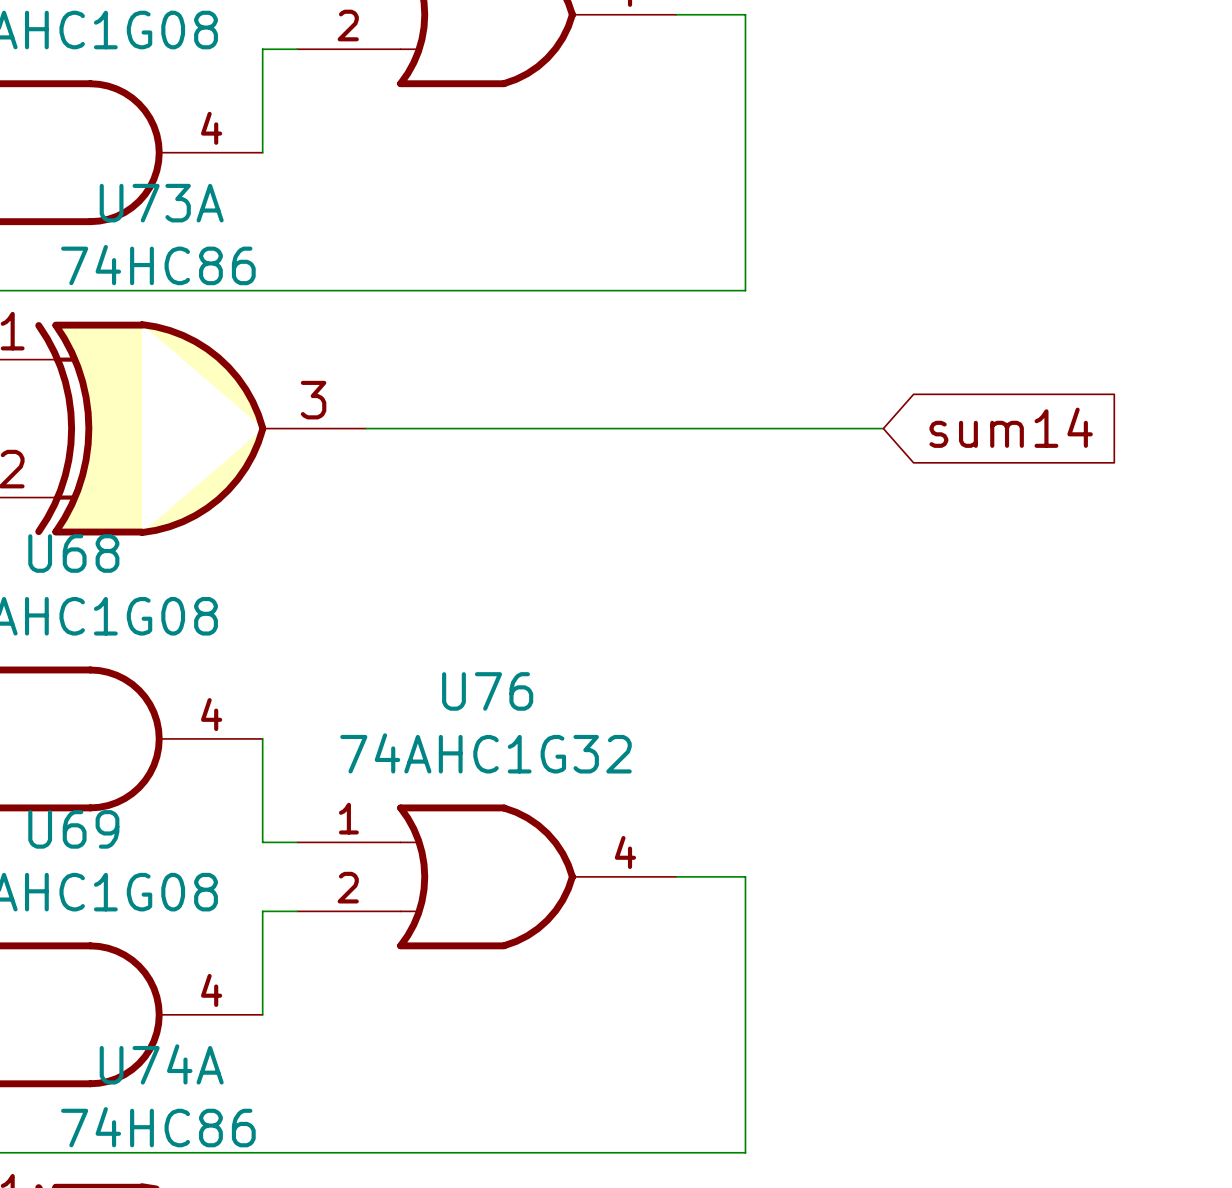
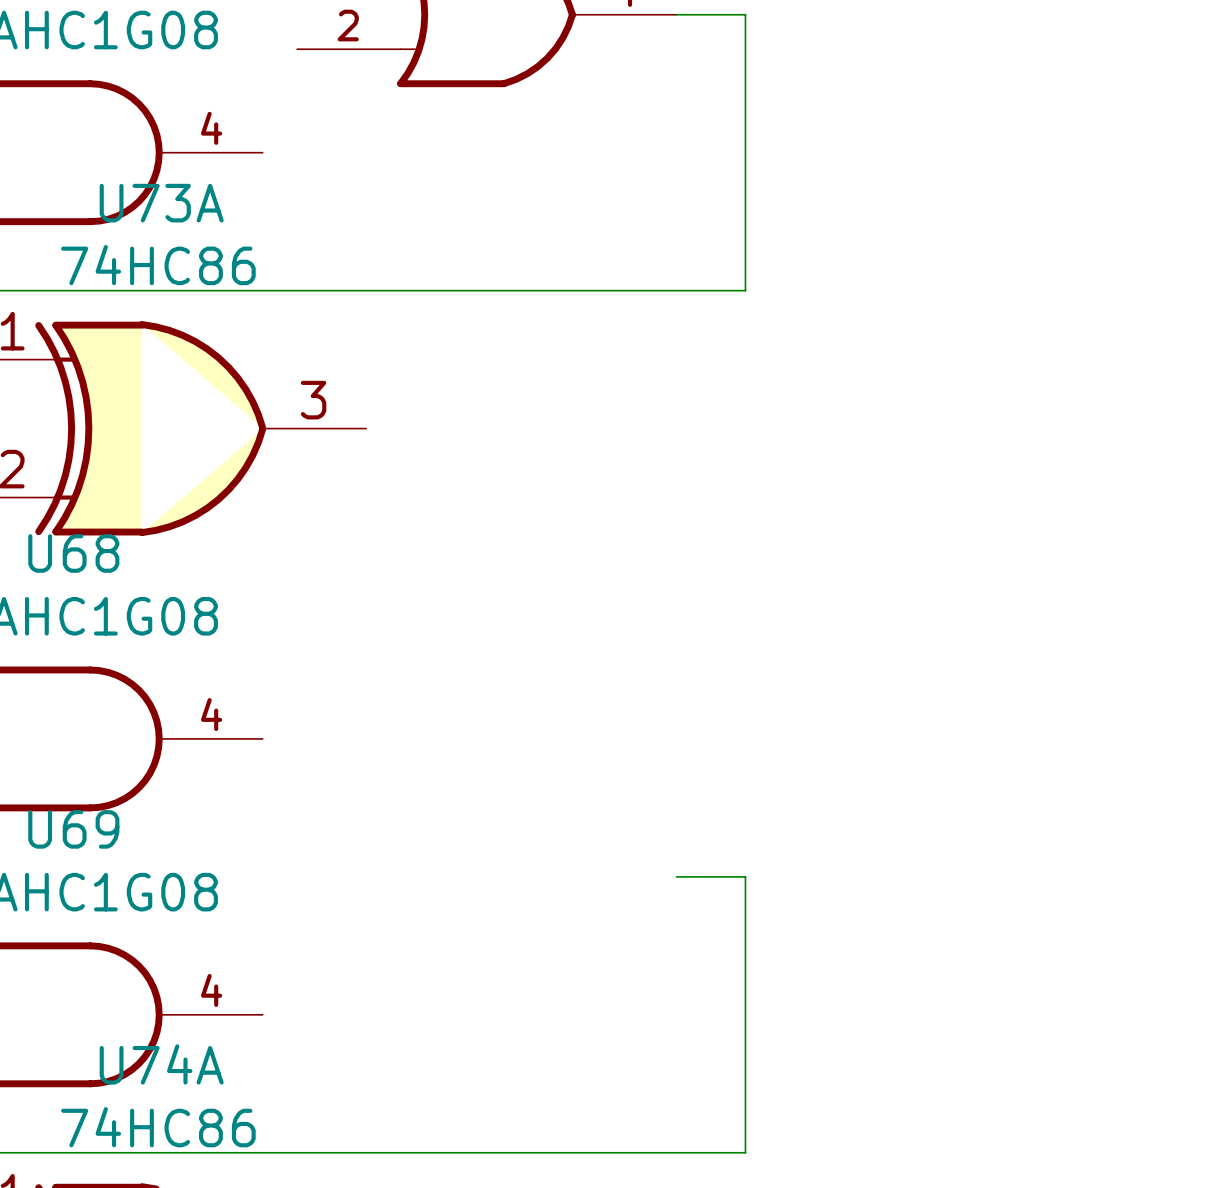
wire: (297, 49) (262, 49) (262, 152) -> none
global label: sum14 (1011, 427) -> none
wire: (366, 428) (883, 428) -> none
wire: (262, 738) (262, 842) (297, 842) -> none
U76: 74AHC1G32 (486, 876) -> none
wire: (297, 911) (262, 911) (262, 1014) -> none

